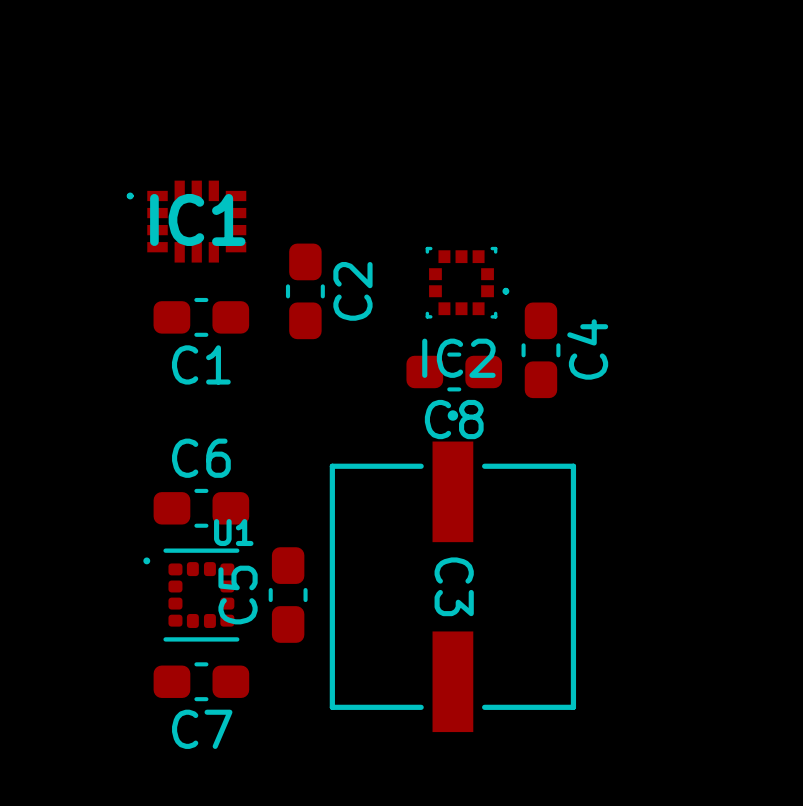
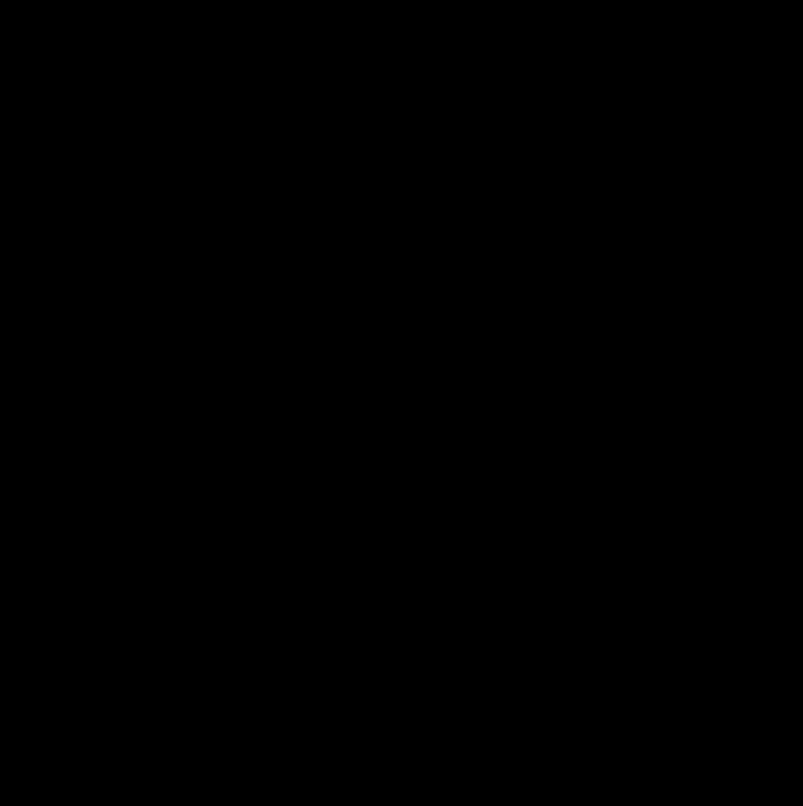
IC1: (186, 221) -> none
IC2: (467, 282) -> none
C2: (305, 291) -> none
C1: (201, 317) -> none
C4: (540, 350) -> none
C8: (454, 371) -> none
C6: (201, 508) -> none
C3: (452, 571) -> none
U1: (191, 595) -> none
C5: (288, 595) -> none
C7: (201, 681) -> none

